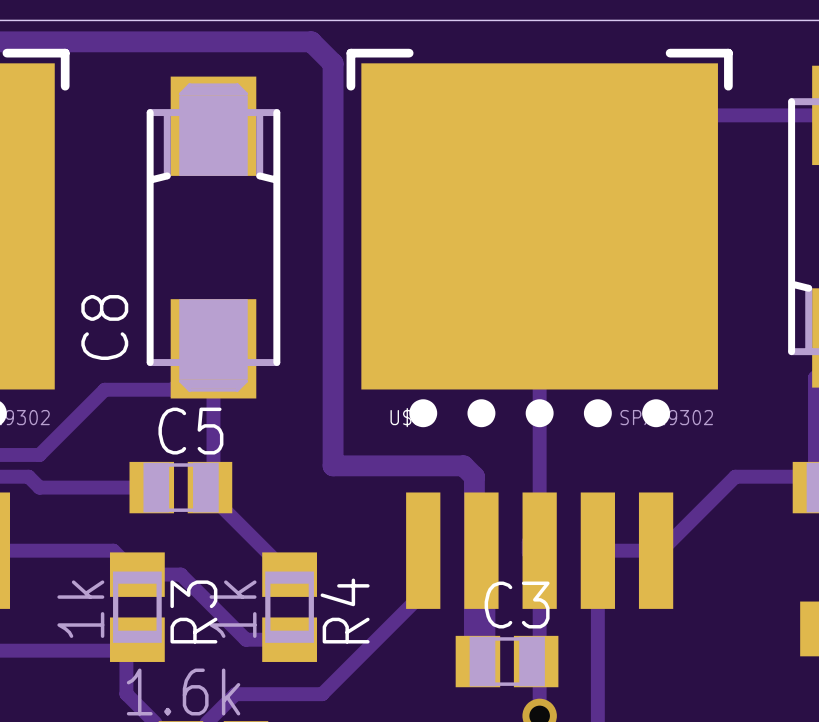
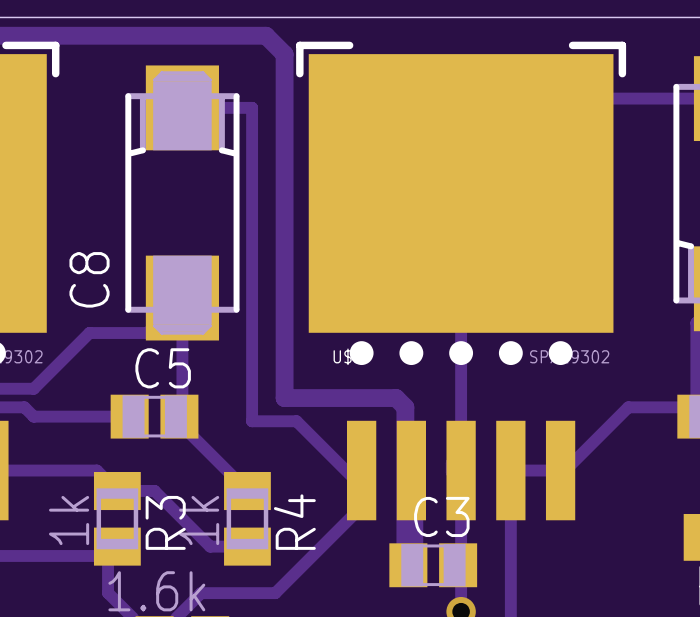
track: none -> (182, 107) (252, 107) (252, 421) (296, 421) (361, 486)

